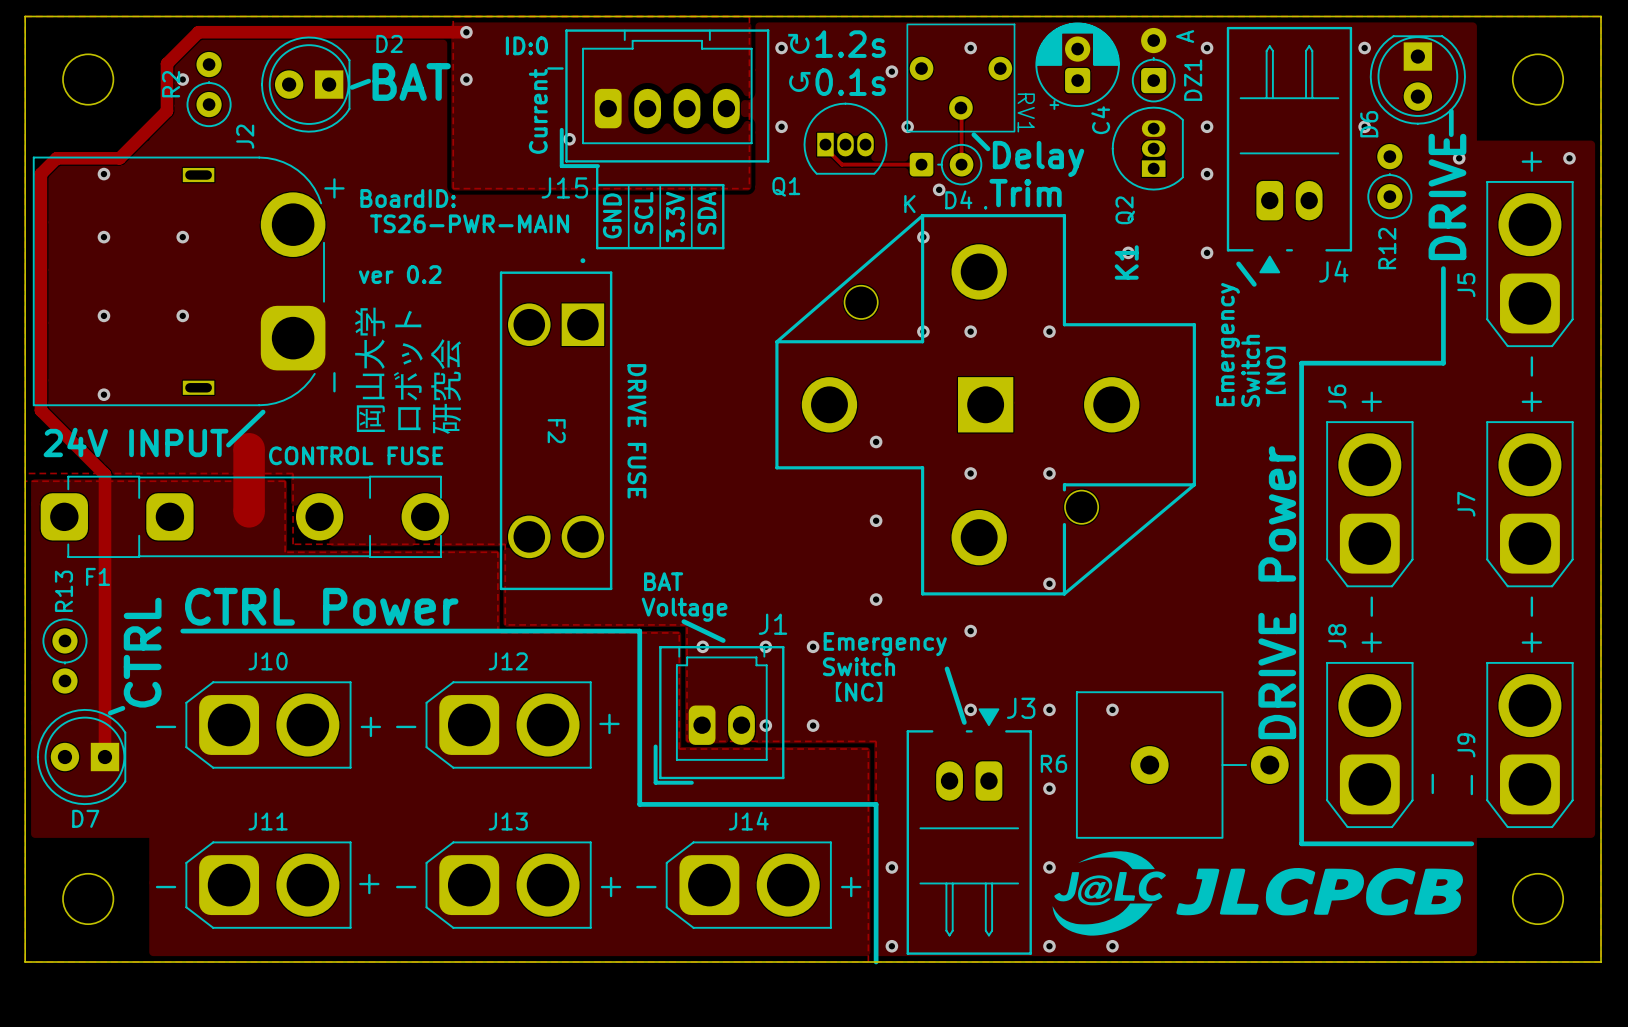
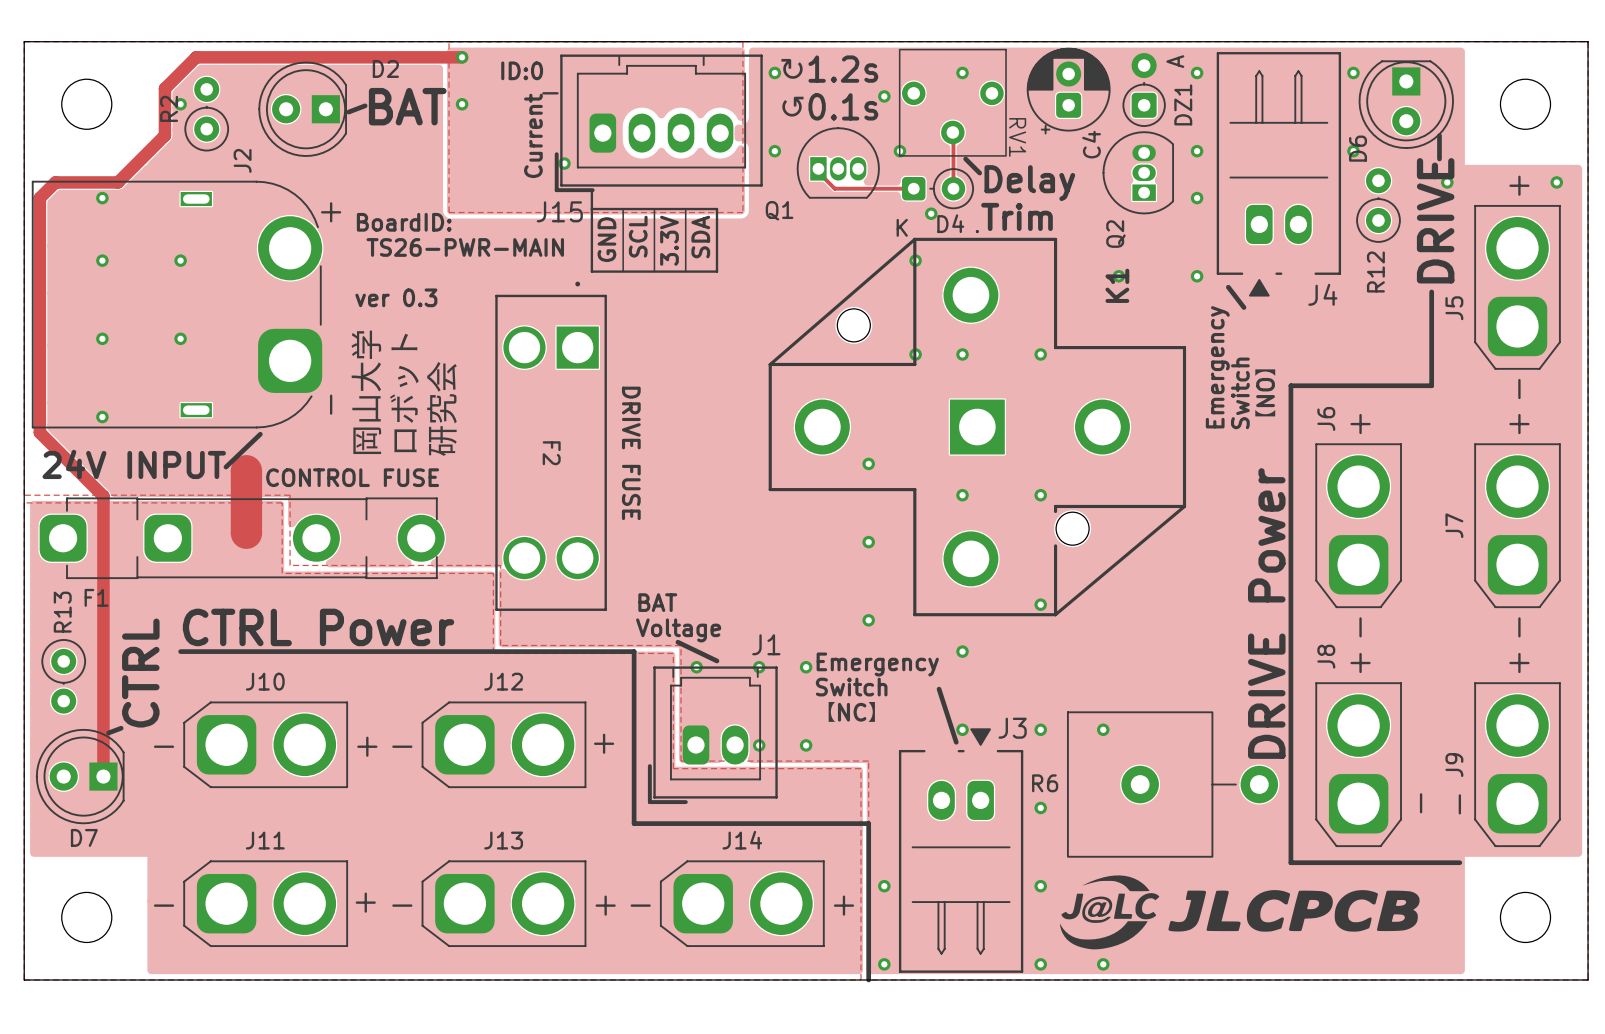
text: ver 0.2 (400, 274) -> ver 0.3 (396, 297)
drawing shape: [1052, 851, 1464, 936] -> [1059, 875, 1420, 950]

